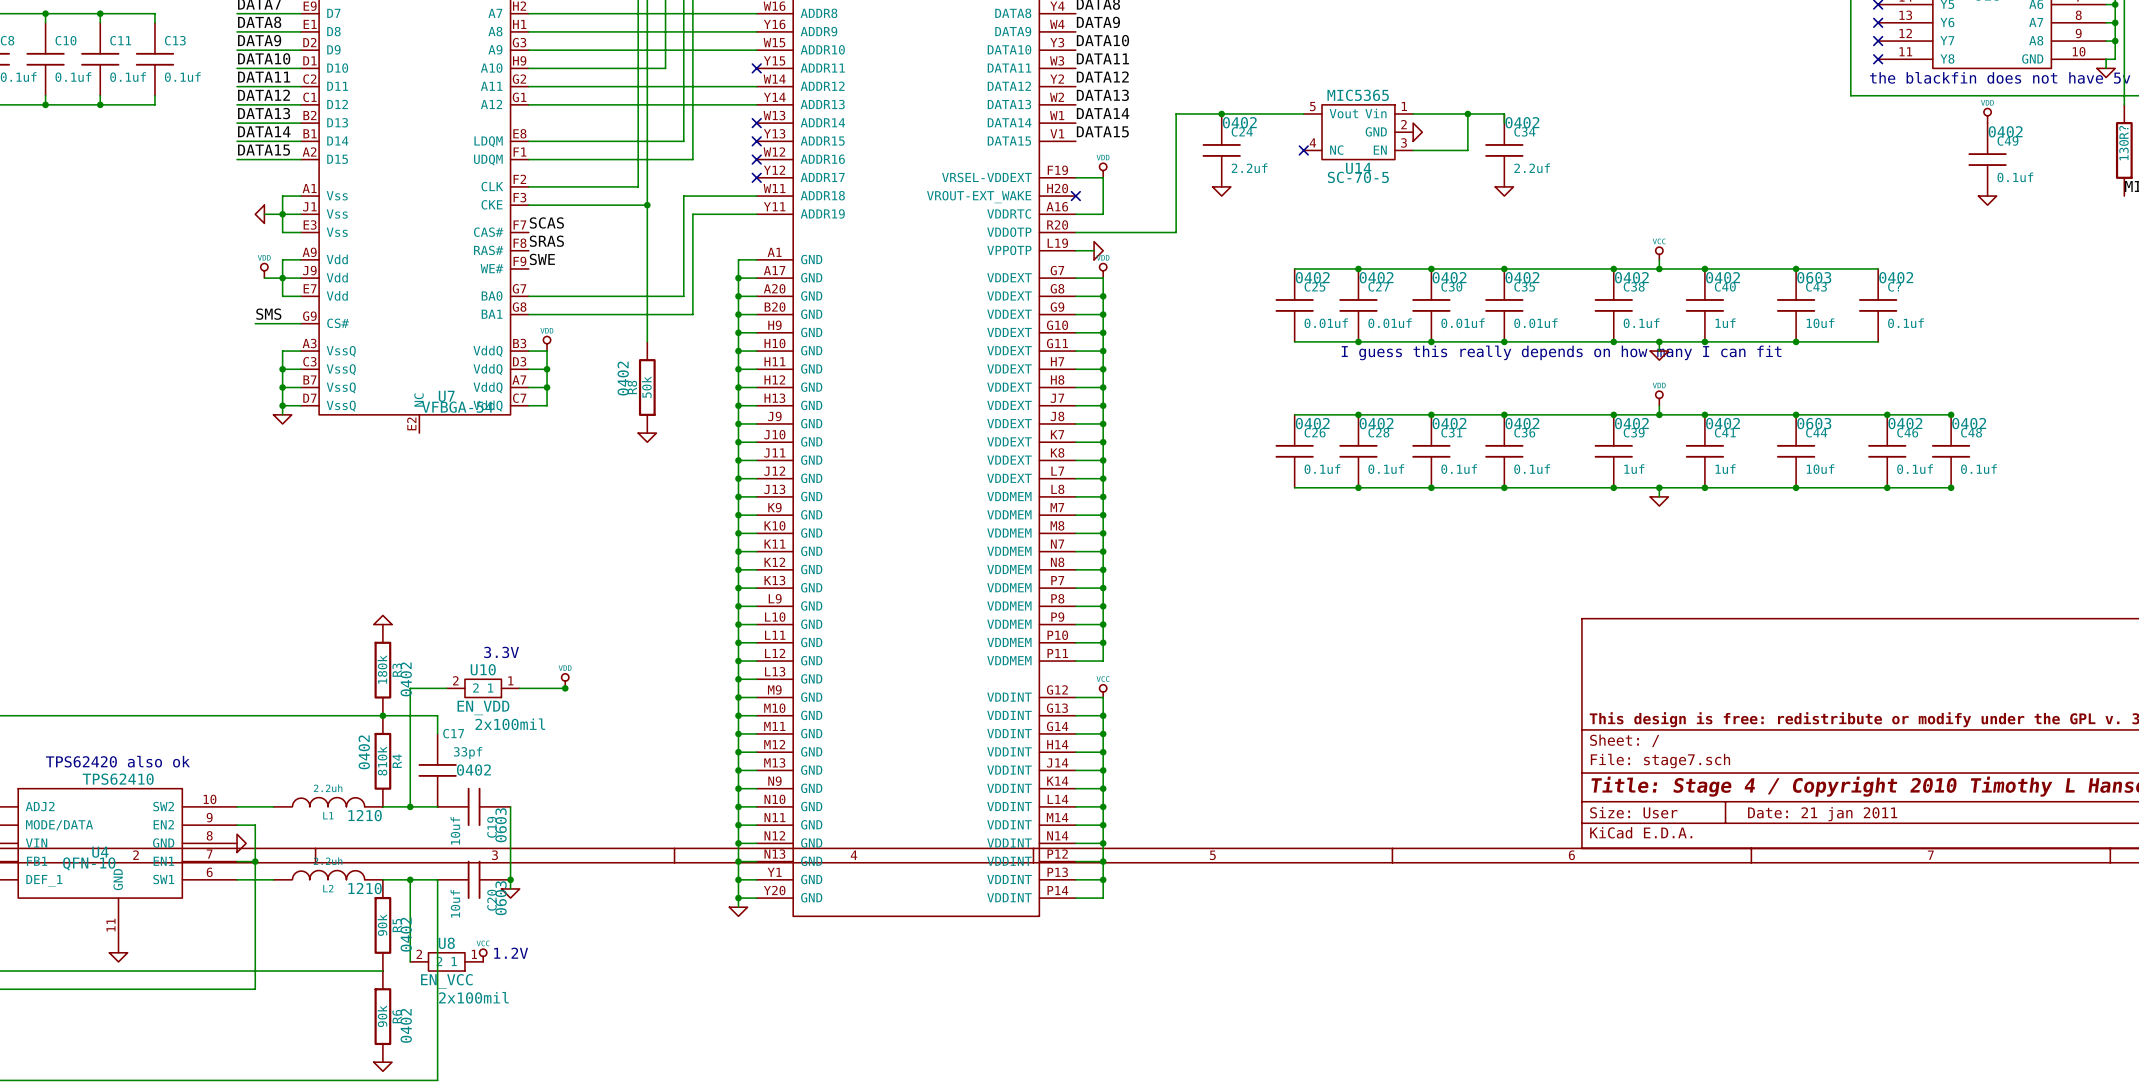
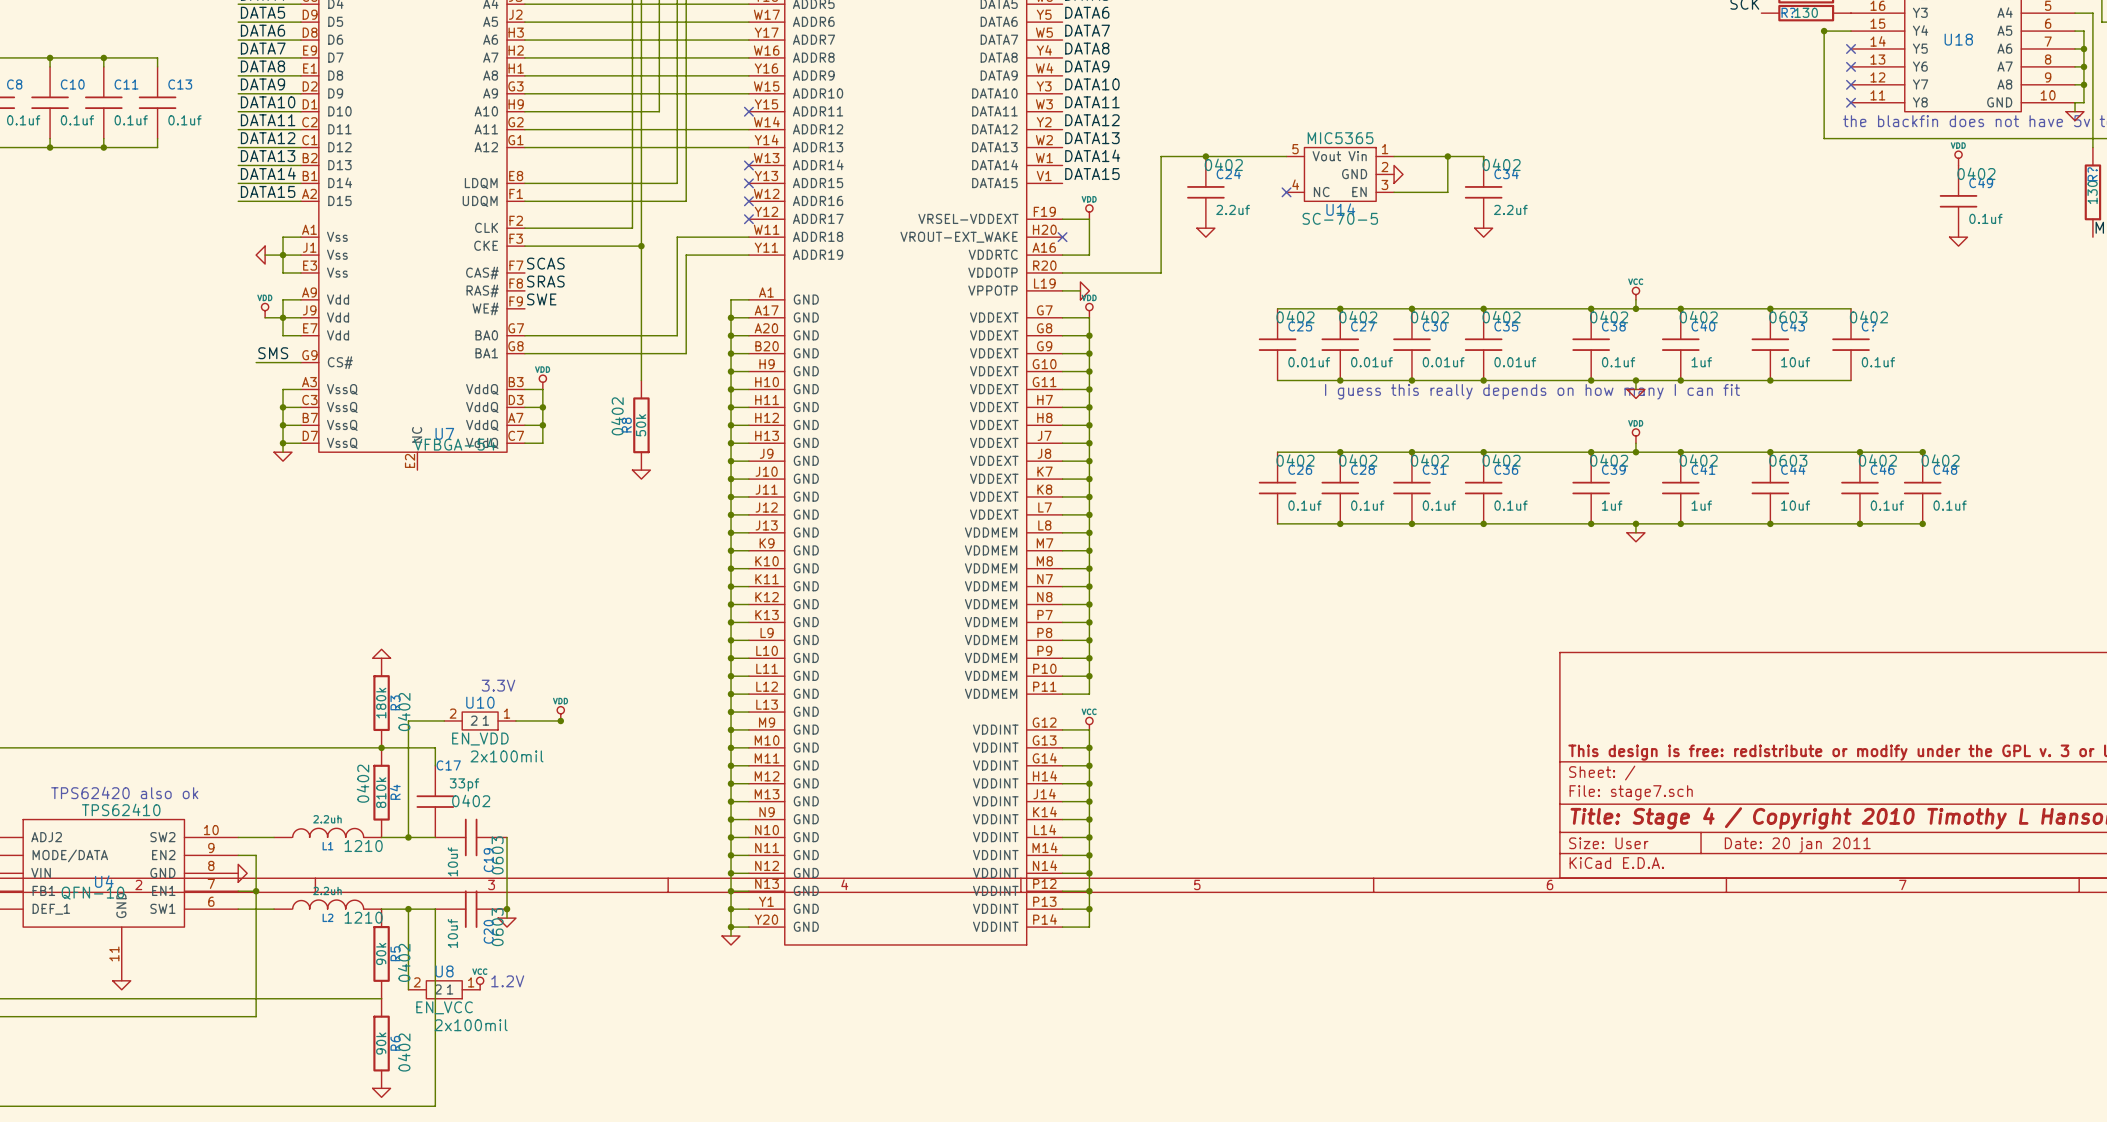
title block: Date: 21 jan 2011 (1822, 814) -> Date: 20 jan 2011 (1797, 845)

